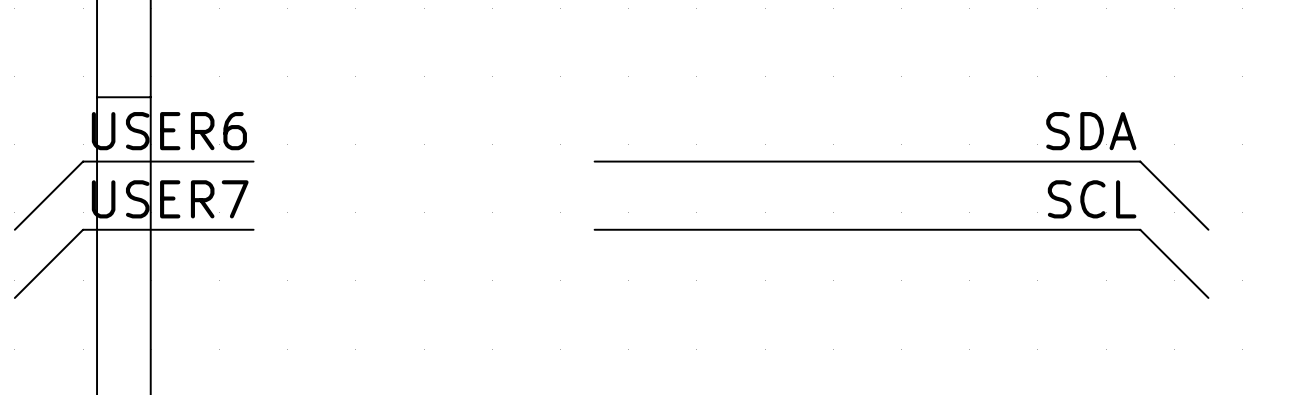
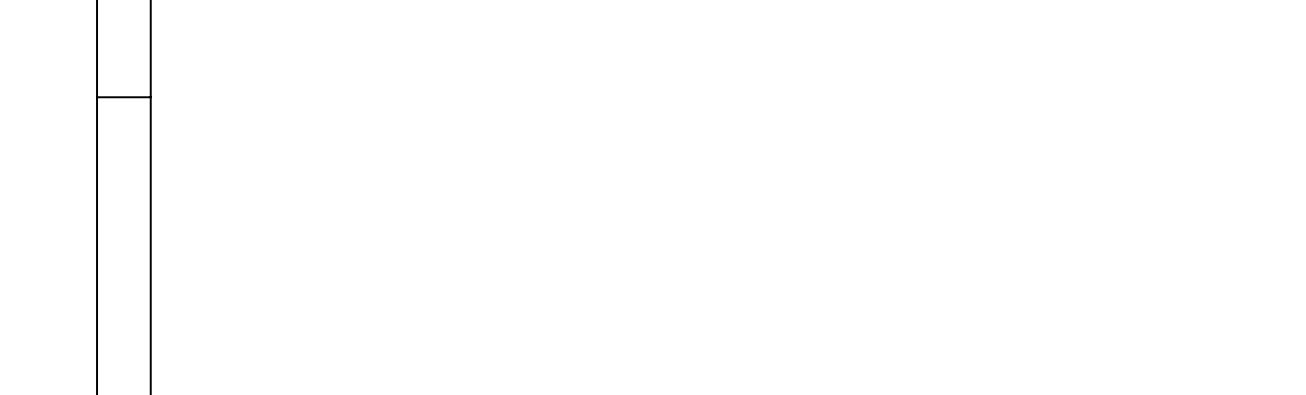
label: USER6 (169, 131) -> none
label: SDA (1091, 131) -> none
wire: (253, 161) (83, 161) (14, 229) -> none
wire: (594, 161) (1140, 161) (1208, 229) -> none
label: USER7 (170, 199) -> none
label: SCL (1092, 199) -> none
wire: (83, 229) (14, 297) -> none
wire: (83, 229) (253, 229) -> none
wire: (594, 229) (1140, 229) (1208, 297) -> none

